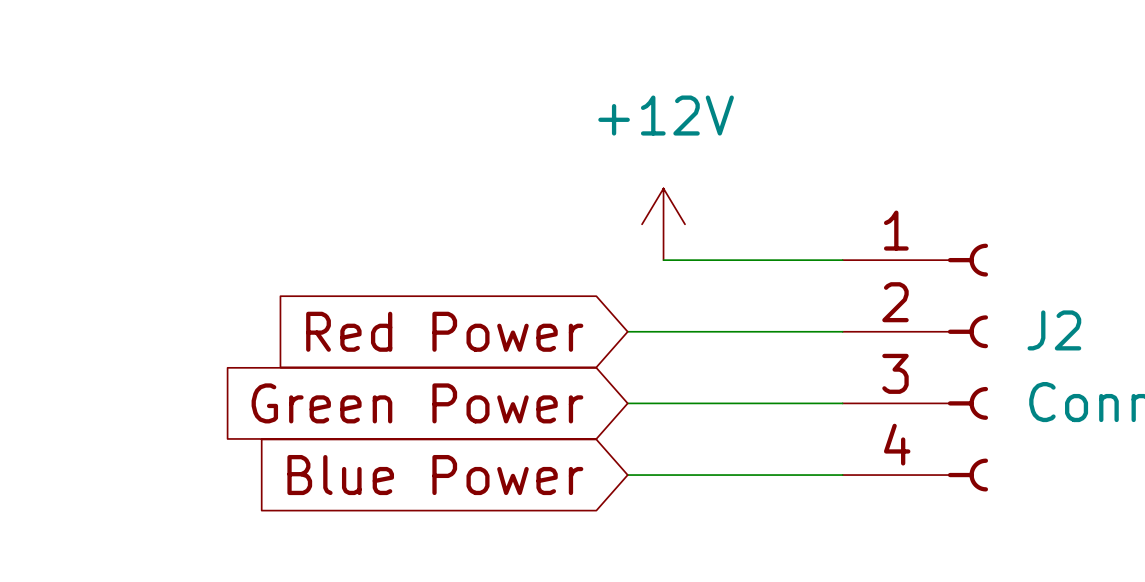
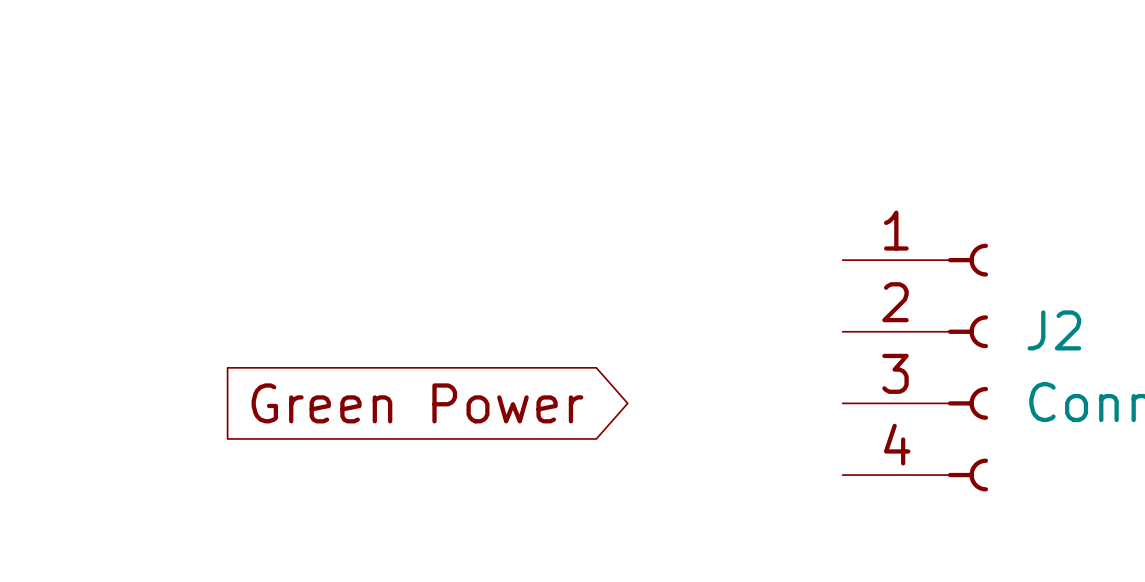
power symbol: +12V (663, 224) -> none
wire: (663, 260) (842, 260) -> none
global label: Red Power (444, 331) -> none
wire: (627, 331) (842, 331) -> none
wire: (627, 403) (842, 403) -> none
global label: Blue Power (435, 475) -> none
wire: (627, 475) (842, 475) -> none

